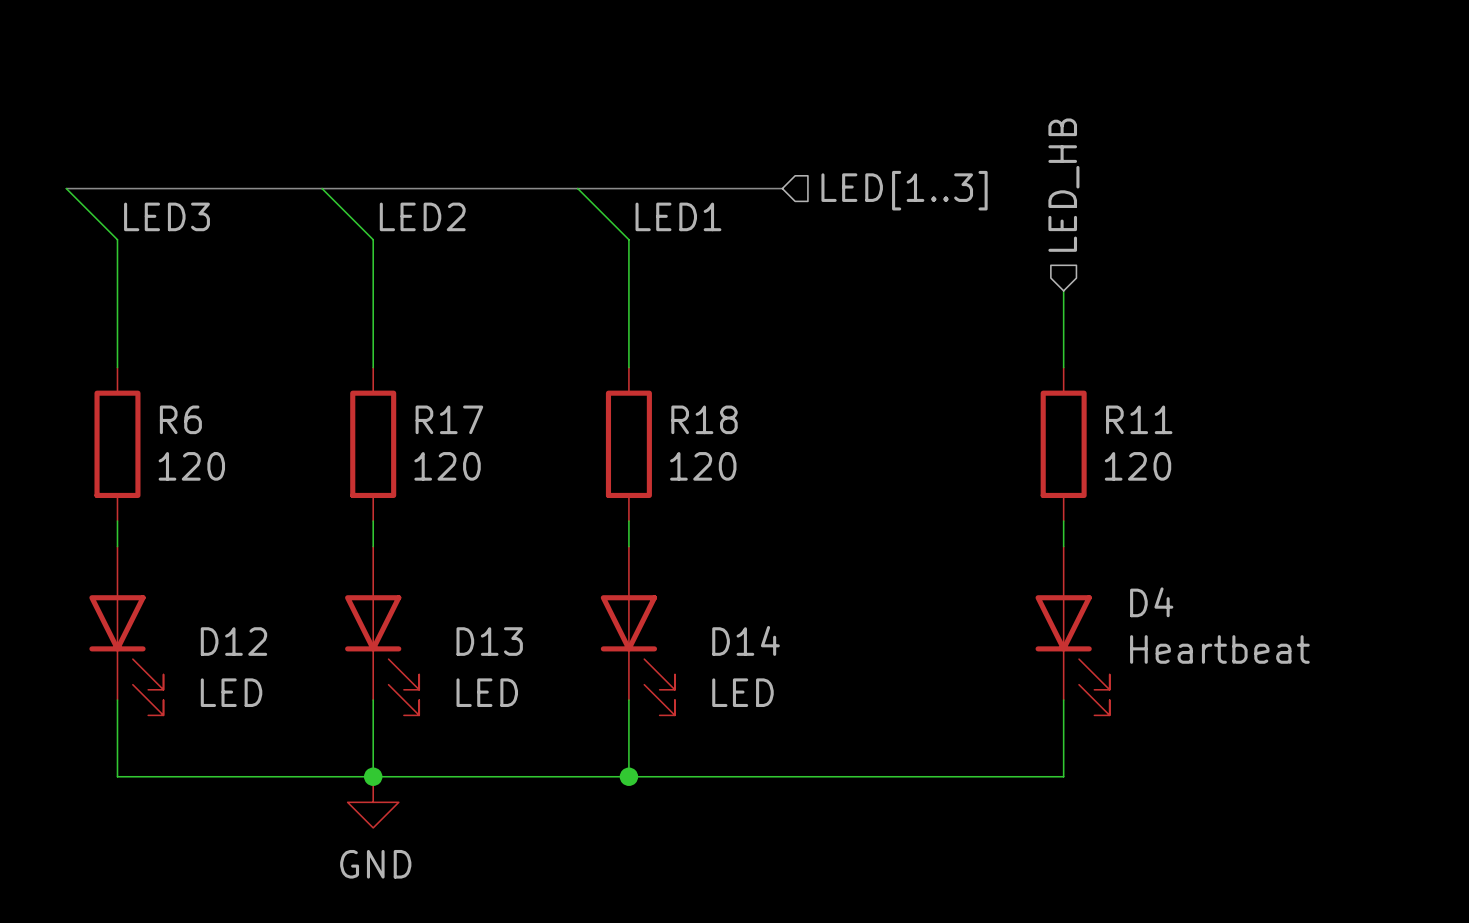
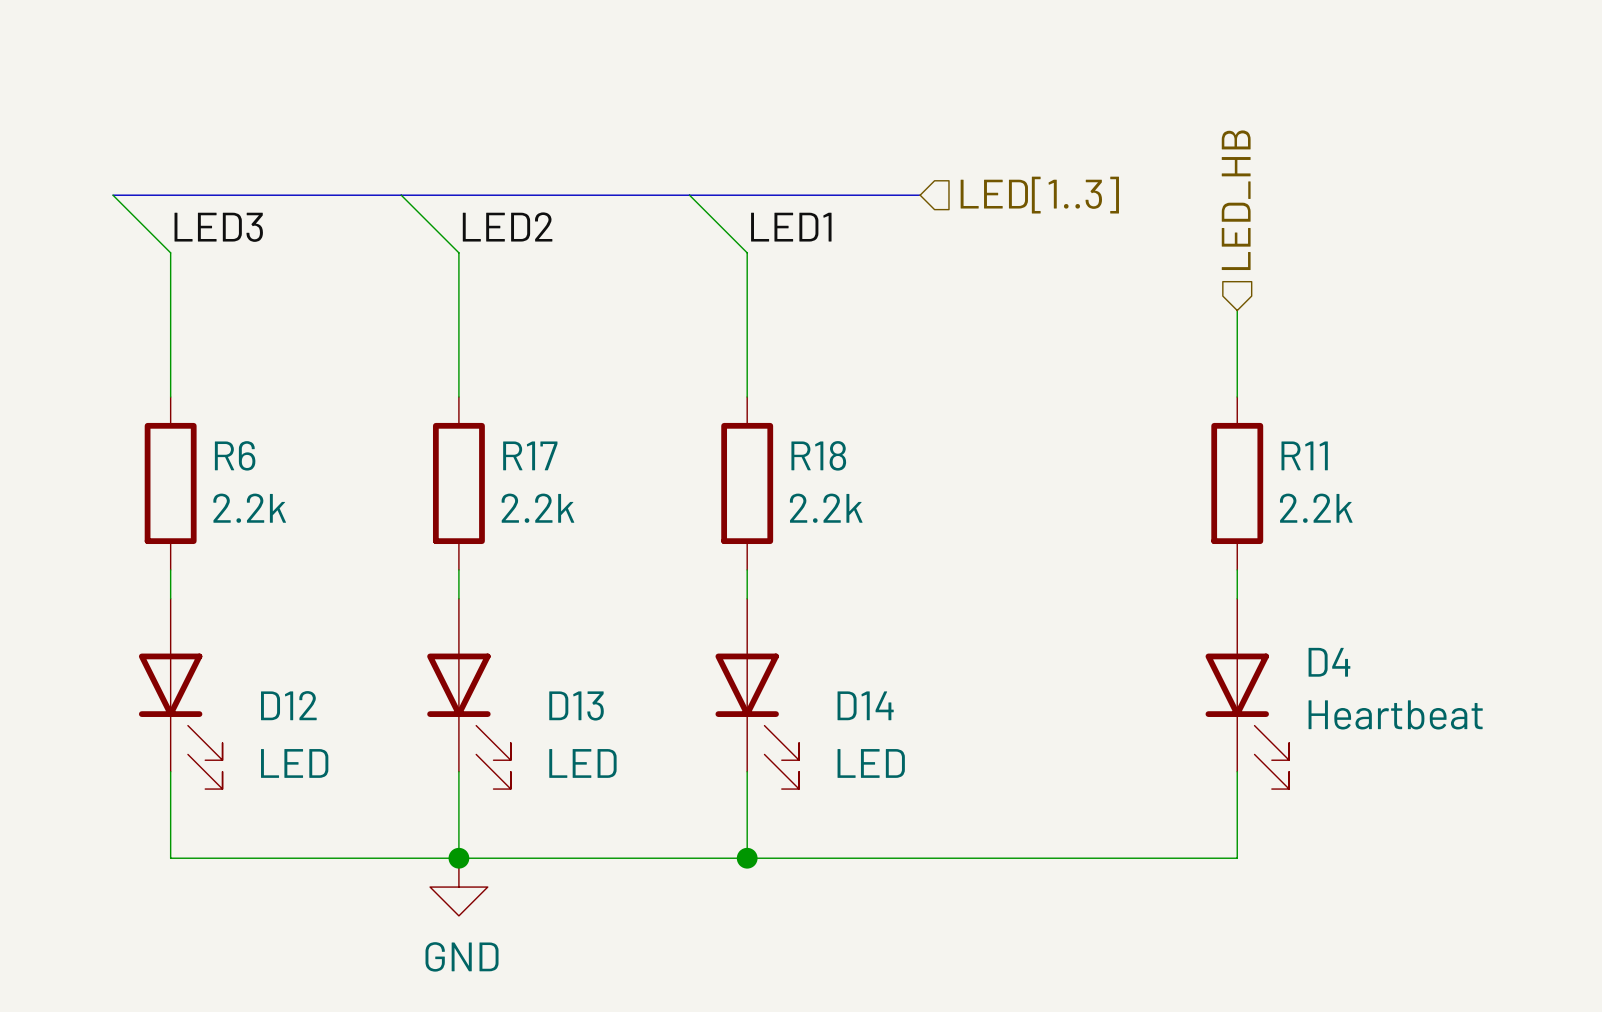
R6 value: 120 (191, 466) -> 2.2k (249, 508)
R17 value: 120 (447, 466) -> 2.2k (537, 508)
R18 value: 120 (703, 466) -> 2.2k (826, 508)
R11 value: 120 (1138, 466) -> 2.2k (1316, 508)

